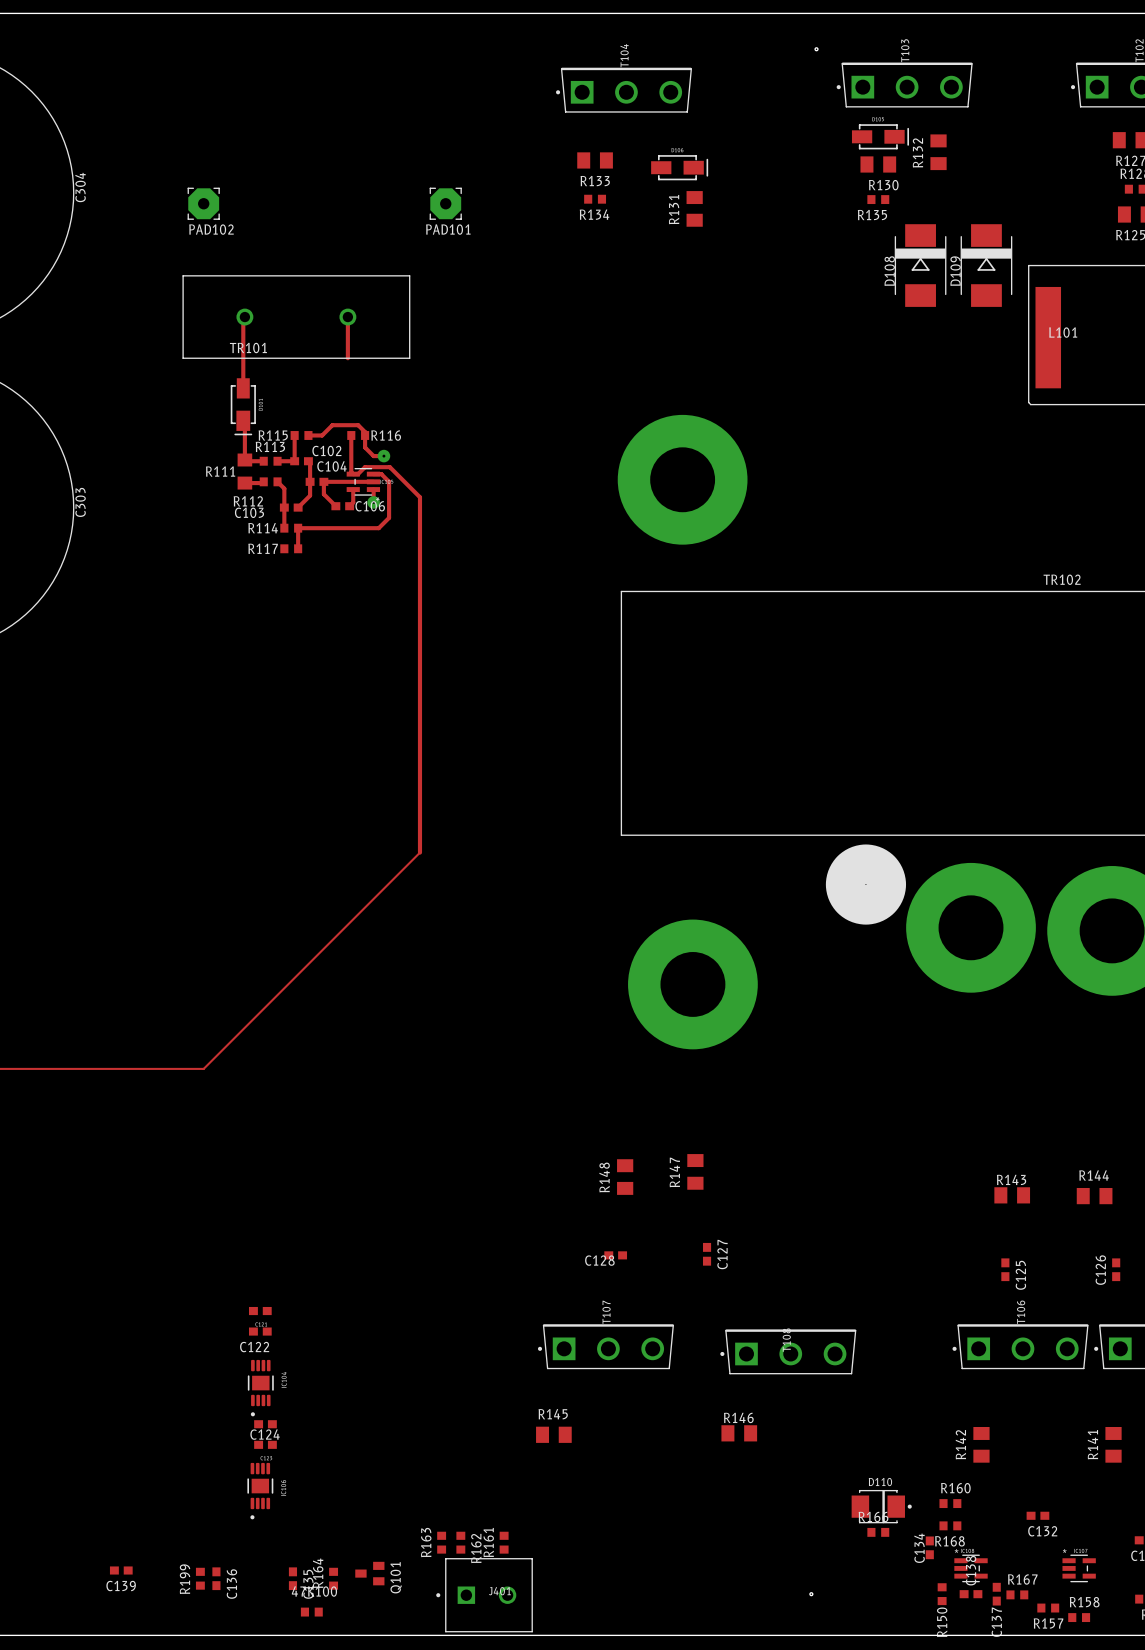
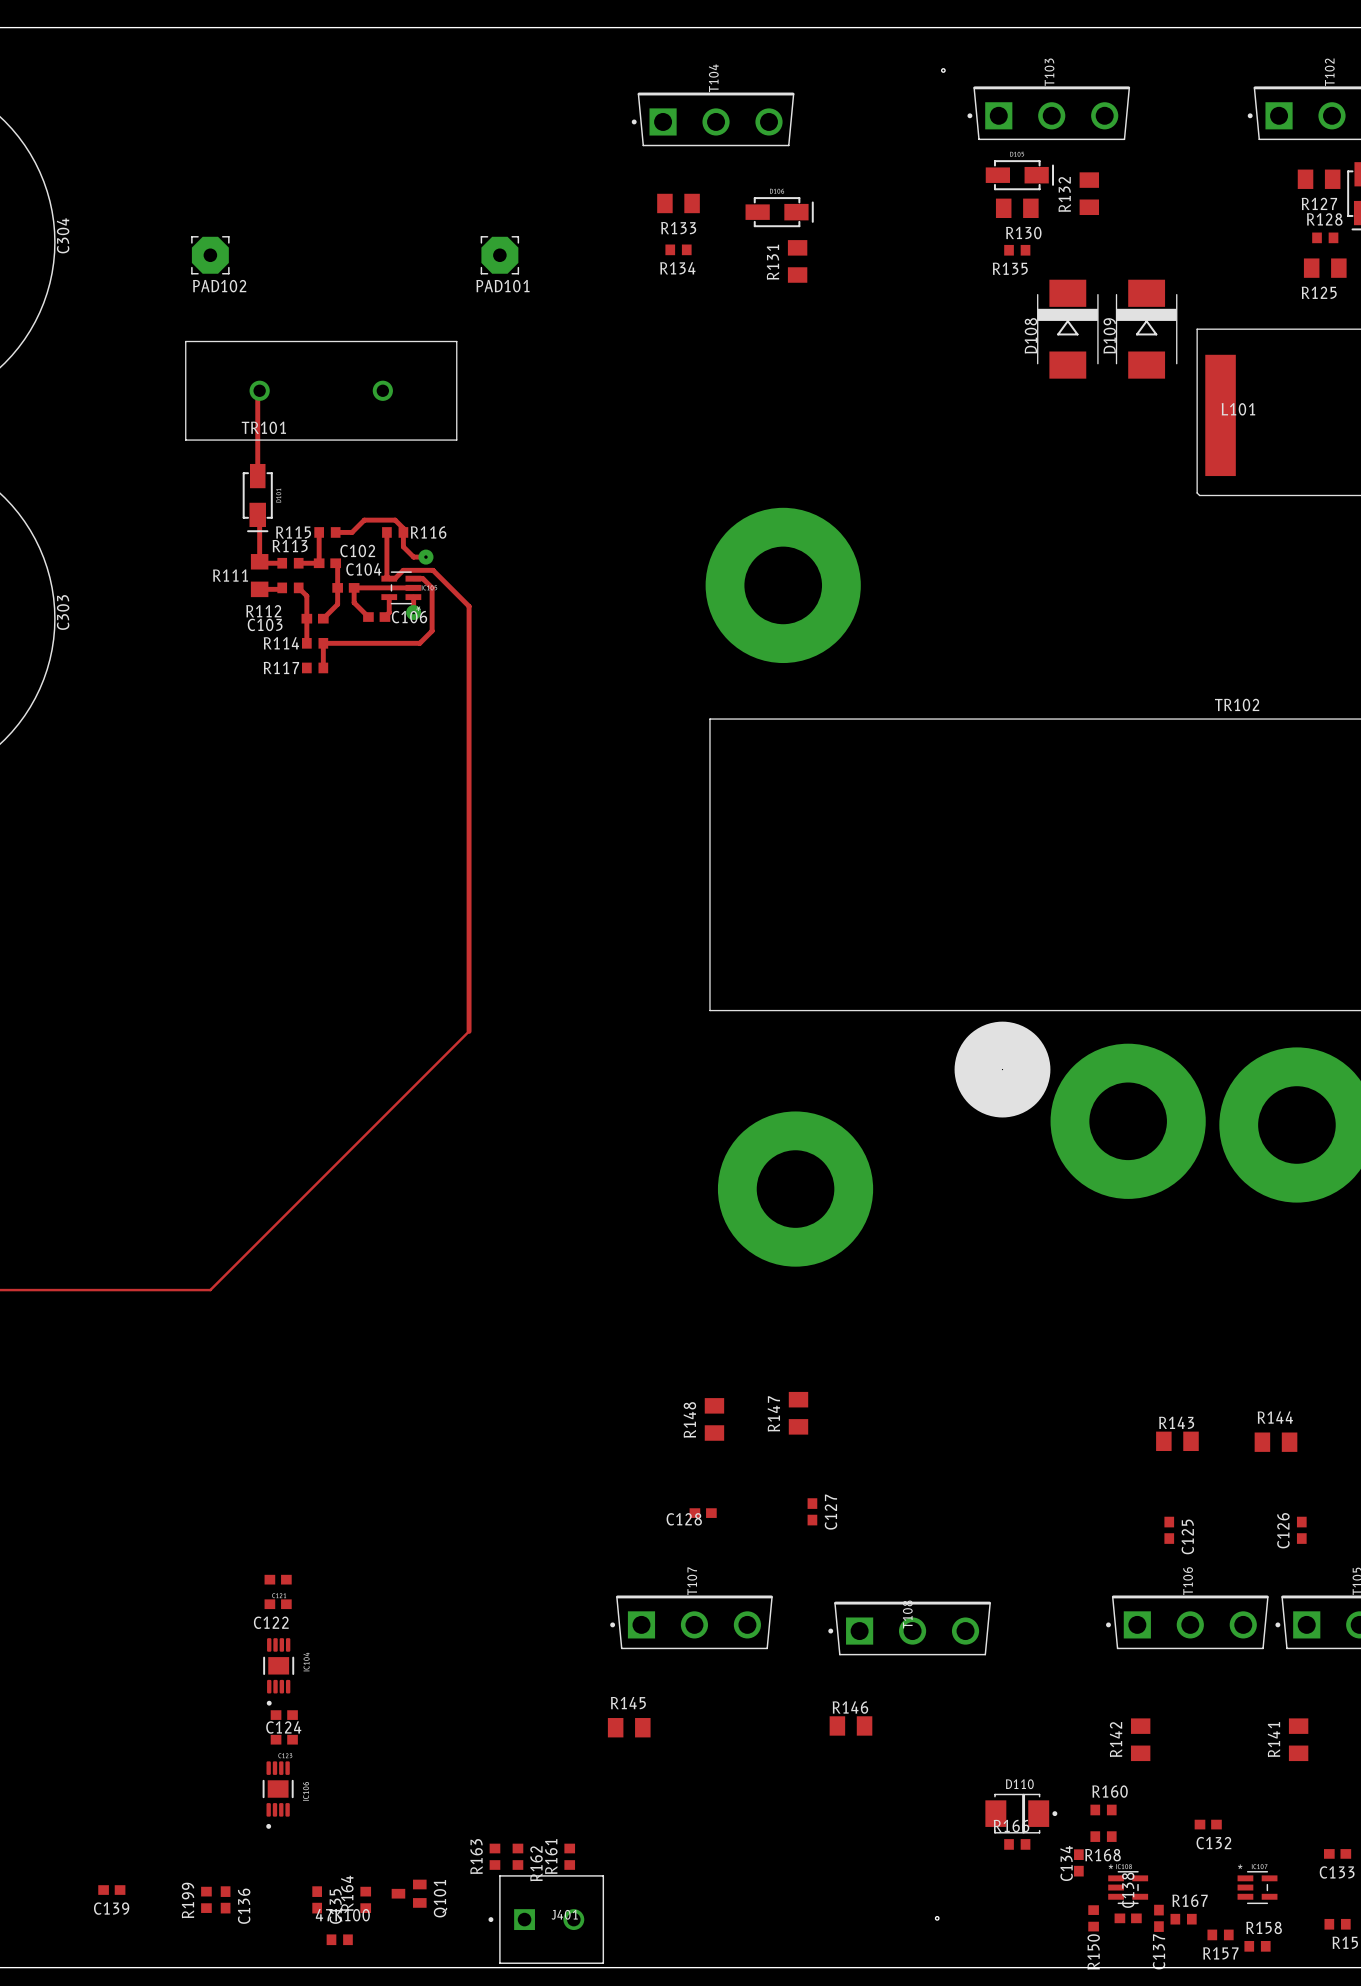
track: (347, 317) (347, 358) -> none

